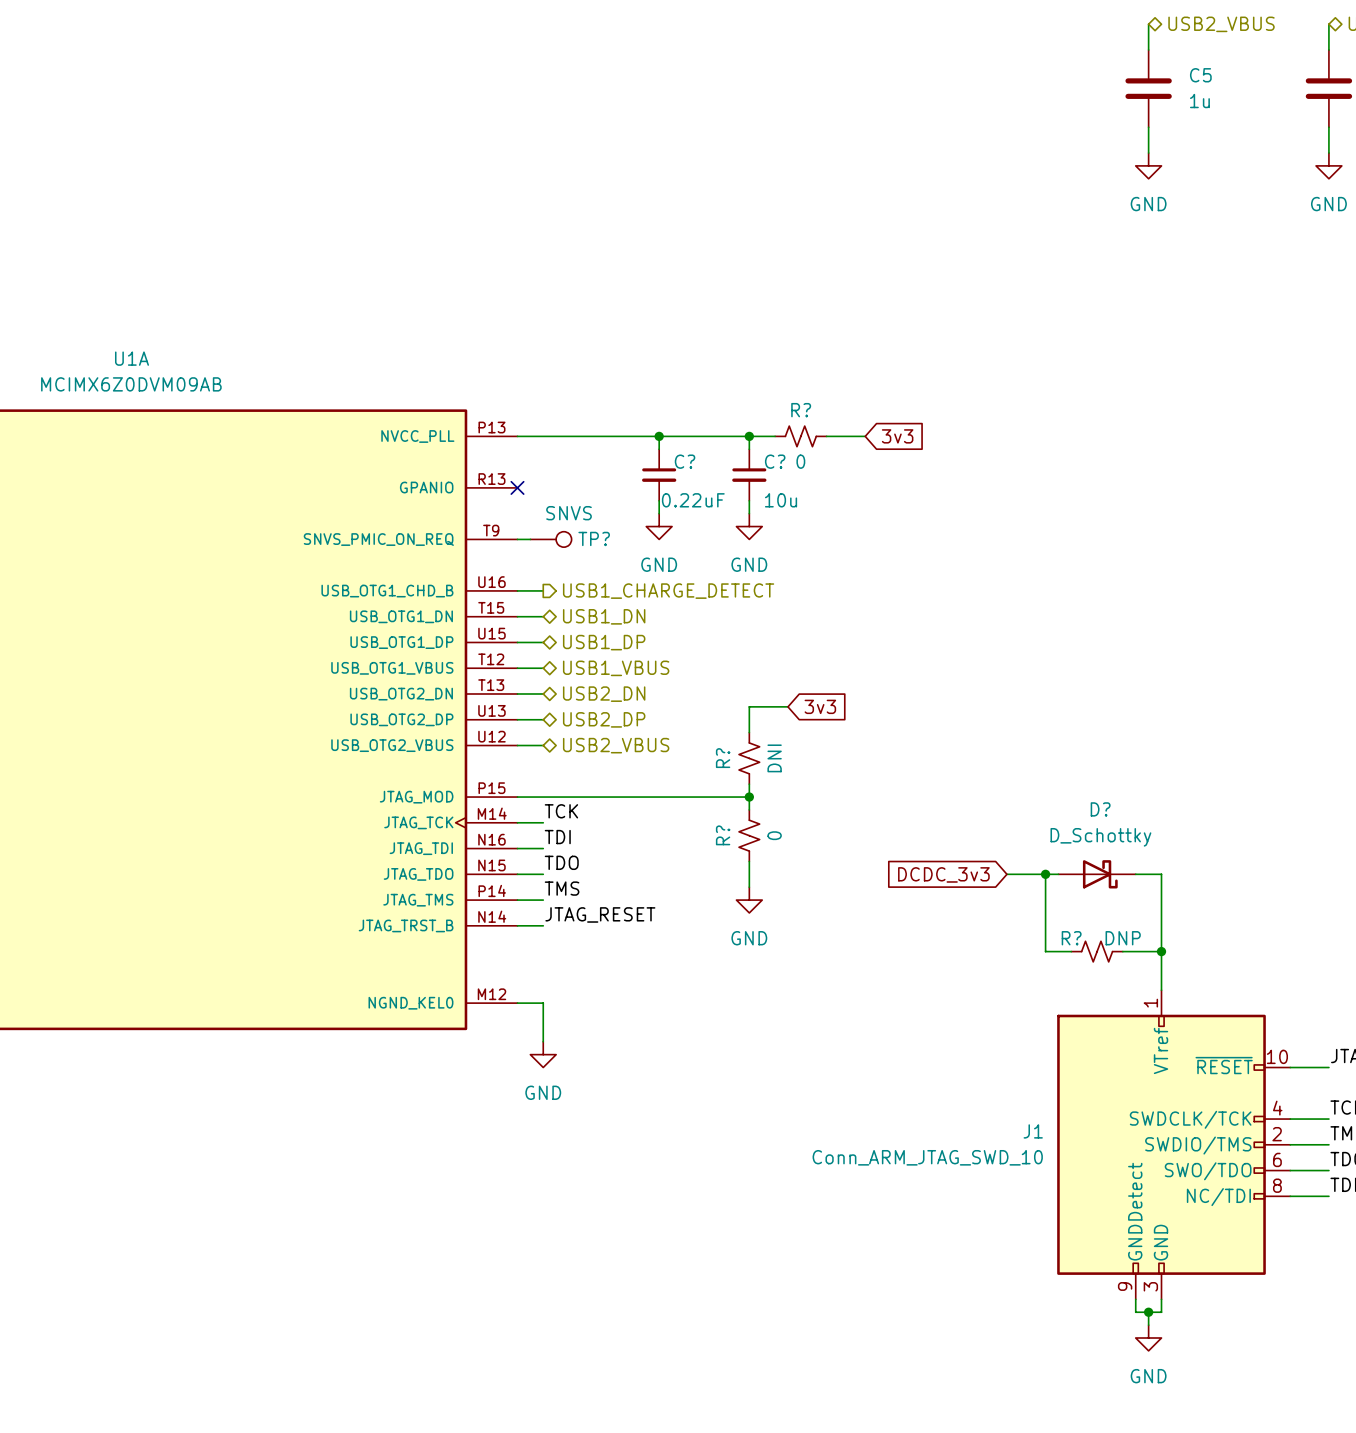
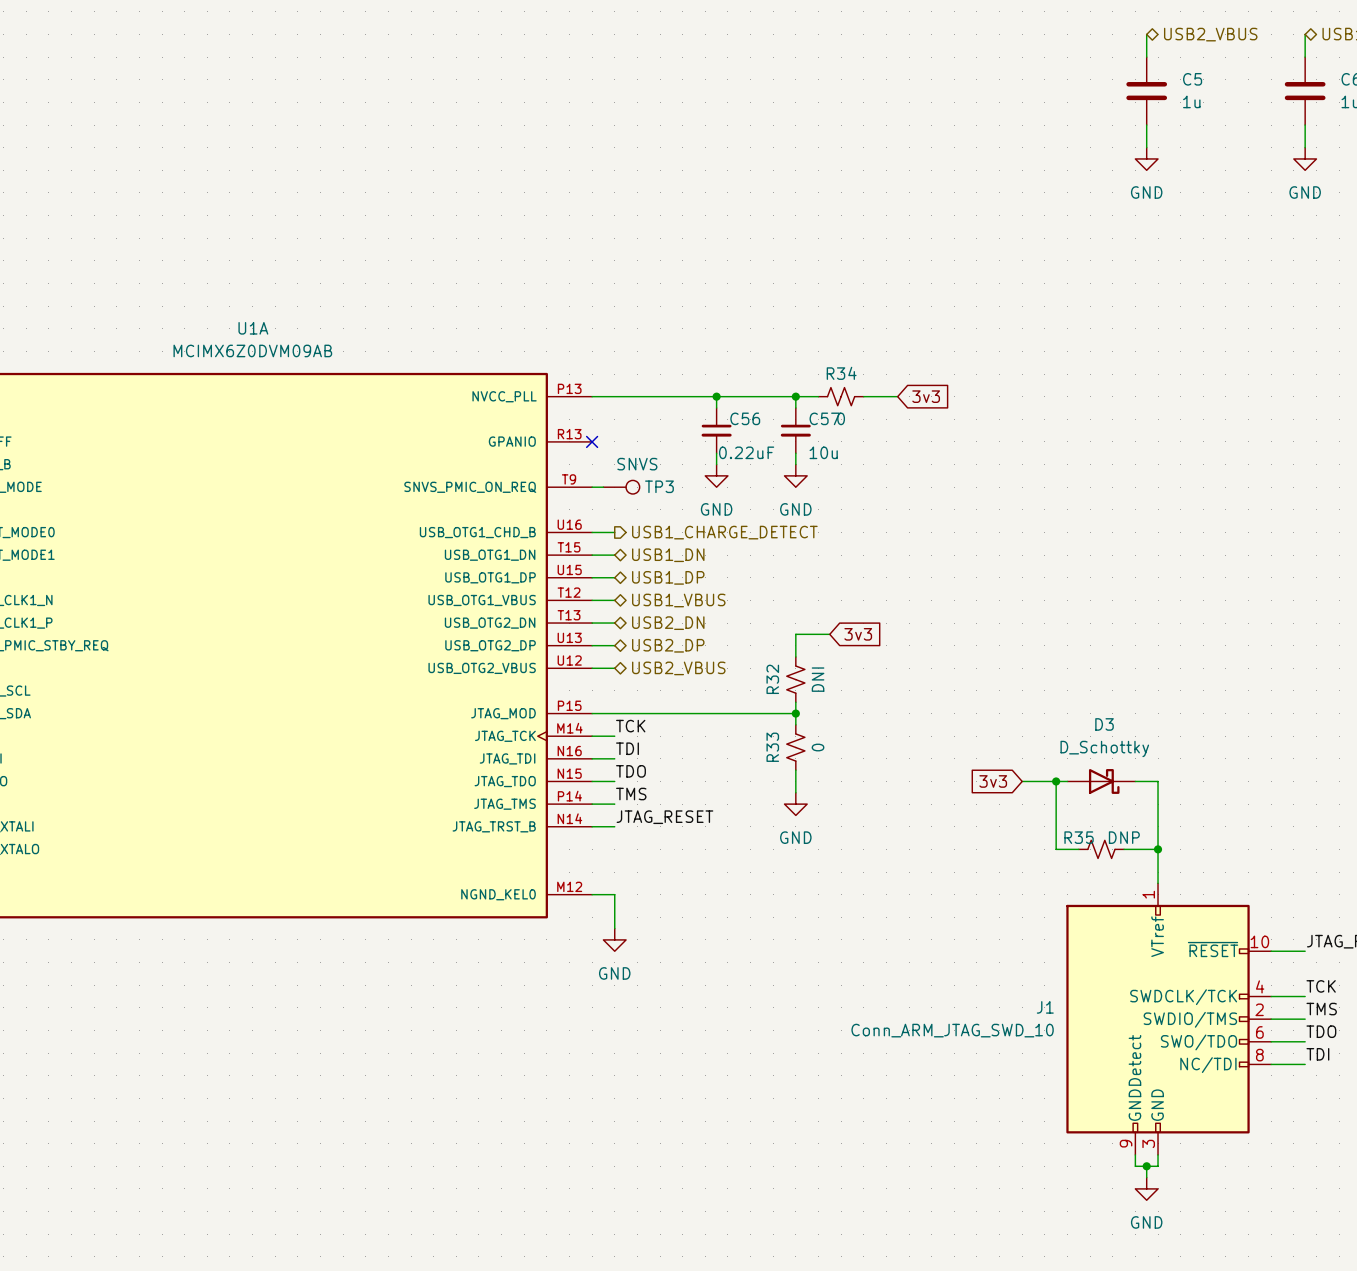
R? name: R? (801, 410) -> R34 (841, 373)
C? name: C? (685, 461) -> C56 (745, 418)
C? name: C? (775, 461) -> C57 (824, 418)
TP? name: TP? (594, 538) -> TP3 (659, 486)
R? name: R? (723, 758) -> R32 (772, 679)
D? name: D? (1100, 809) -> D3 (1104, 724)
R? name: R? (723, 835) -> R33 (772, 747)
global label: DCDC_3v3 (943, 874) -> 3v3 (993, 781)
R? name: R? (1071, 938) -> R35 (1079, 837)

